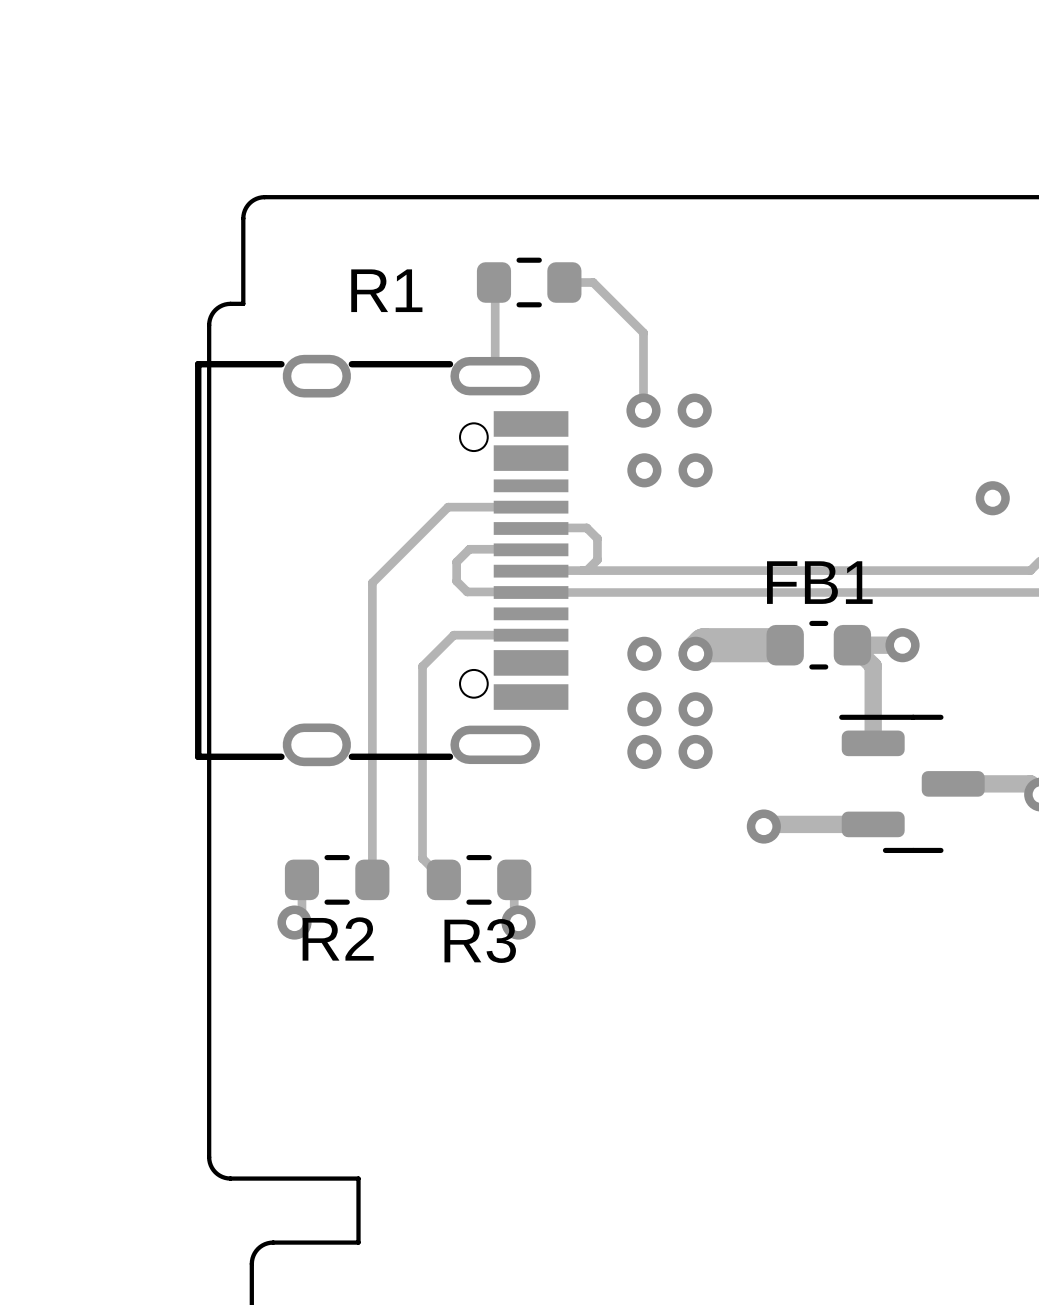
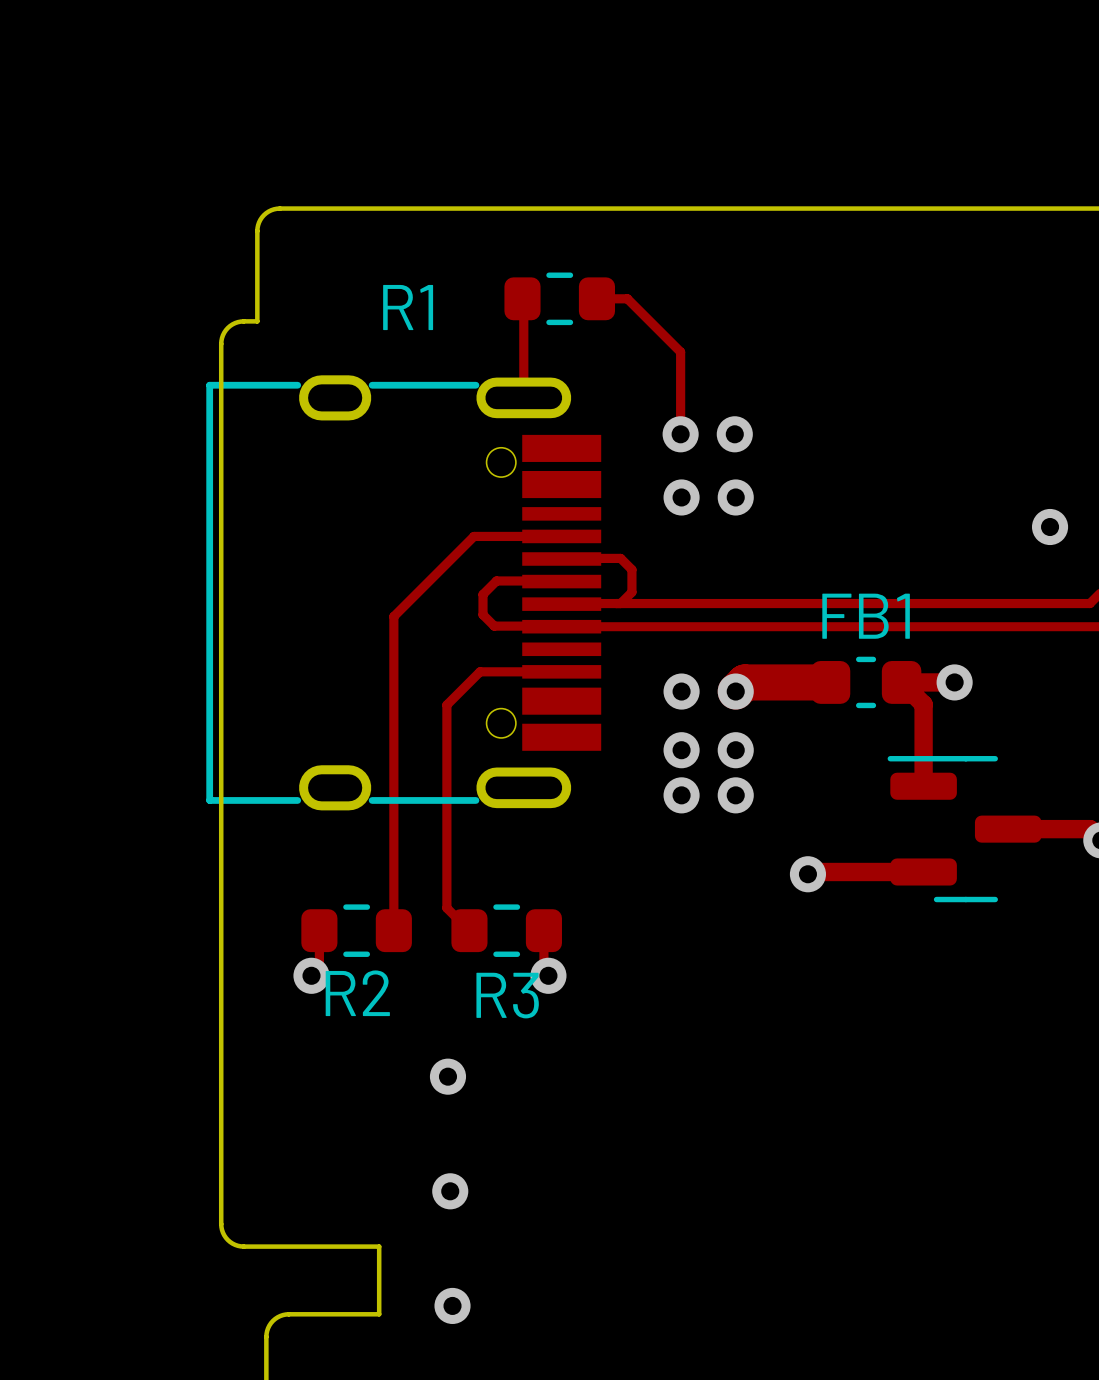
via: none -> (447, 1076)
via: none -> (450, 1191)
via: none -> (452, 1305)

